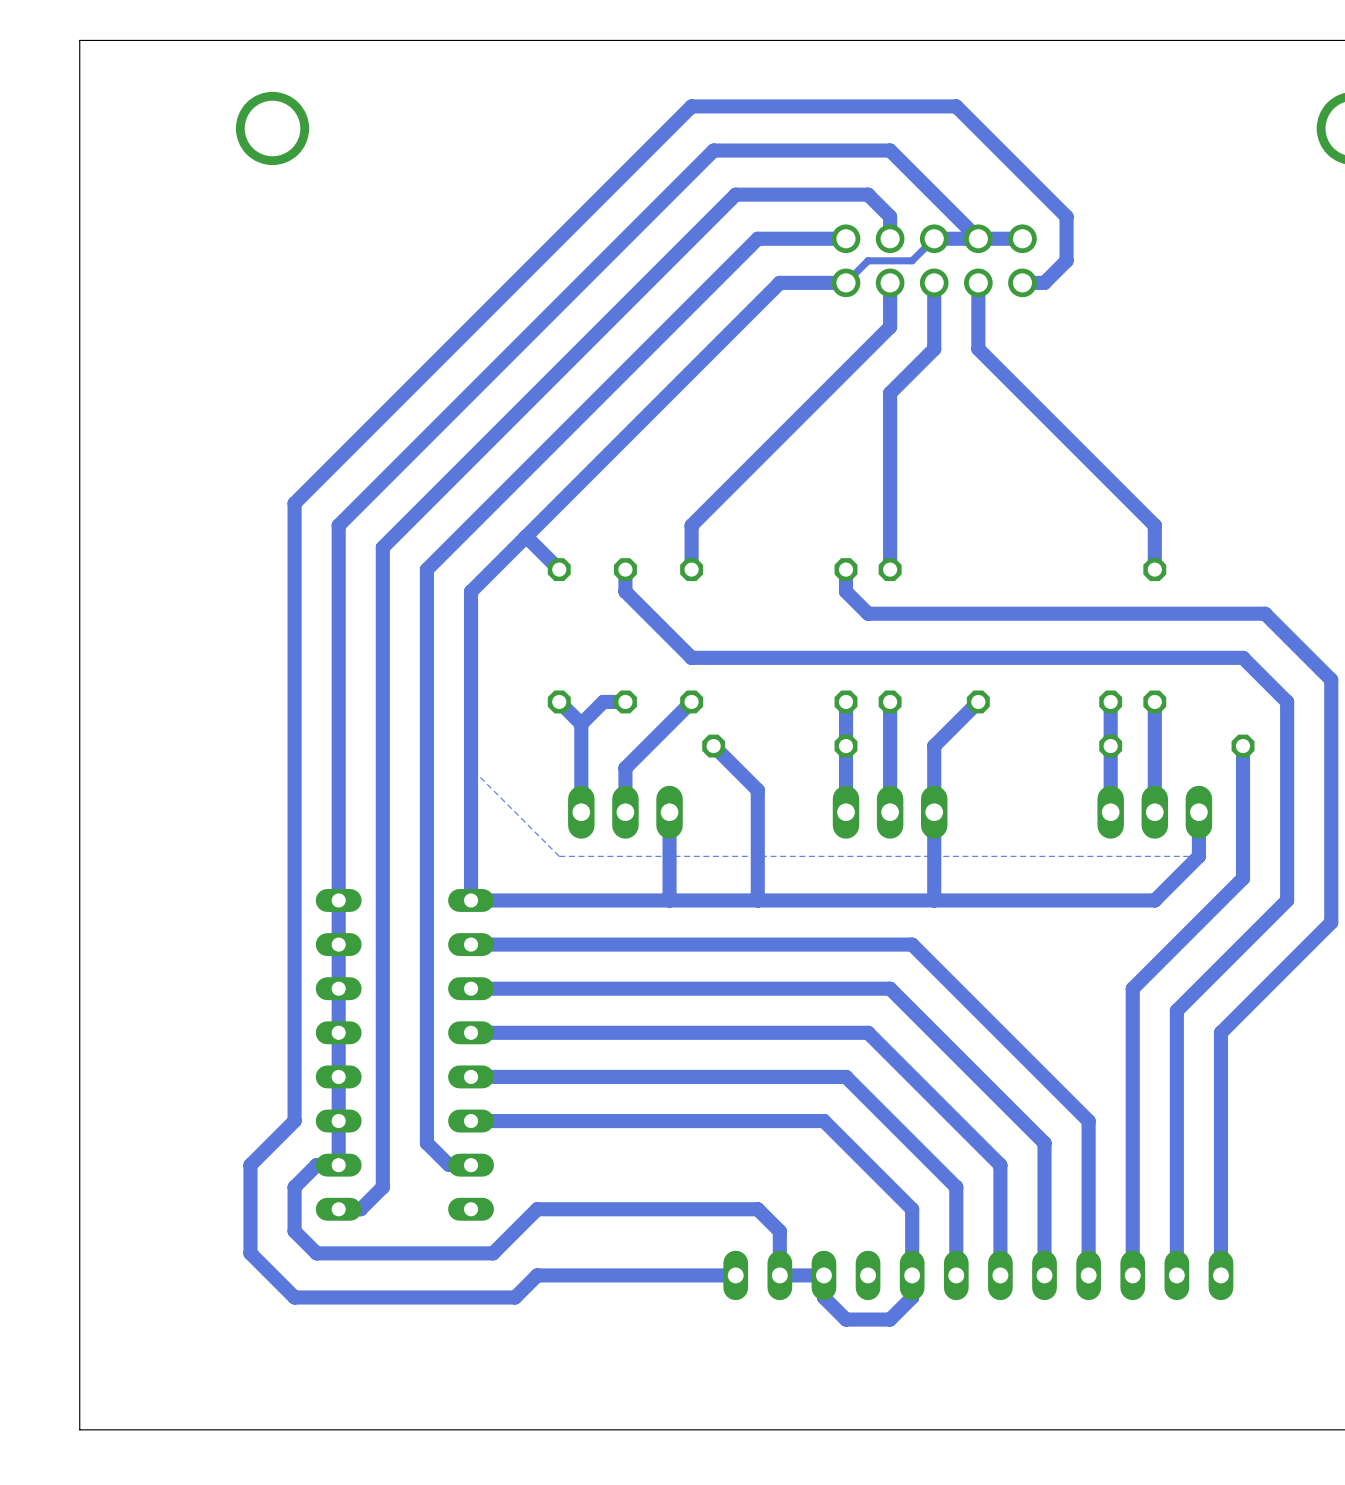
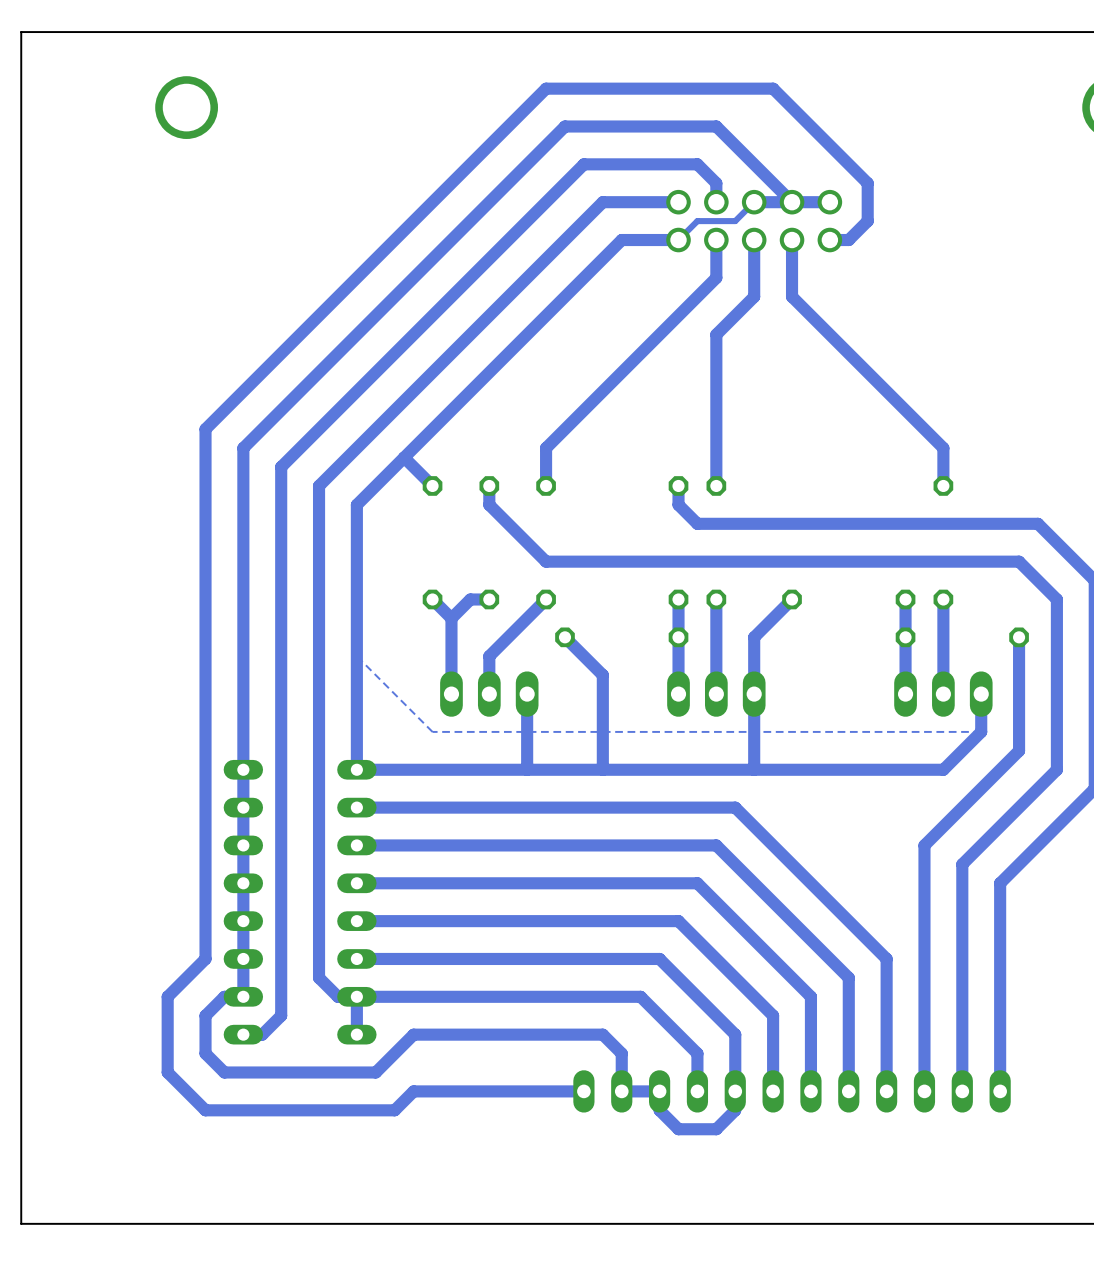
track: none -> (337, 996) (640, 996) (697, 1053) (697, 1091)
track: none -> (356, 996) (356, 1034)

